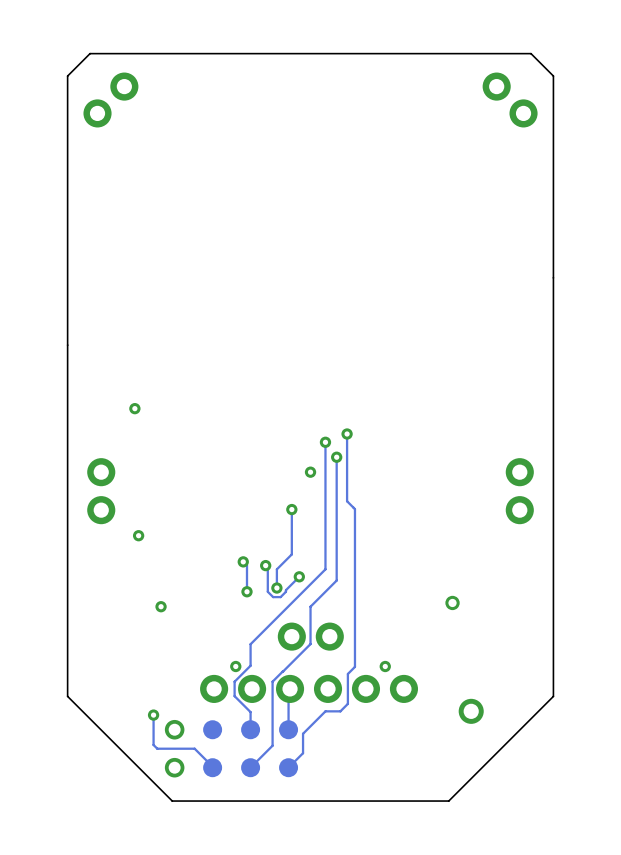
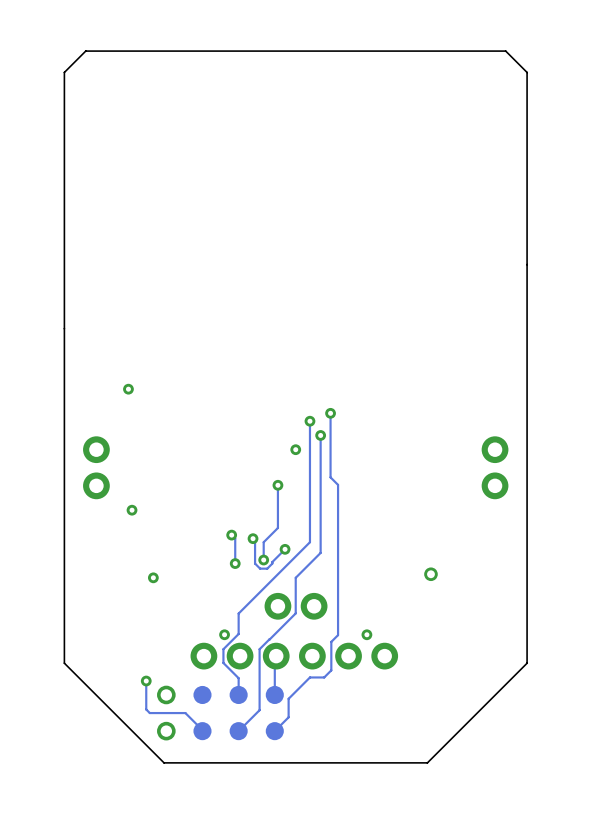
part: (110, 100) -> none
part: (510, 100) -> none
part: (471, 711) -> none

